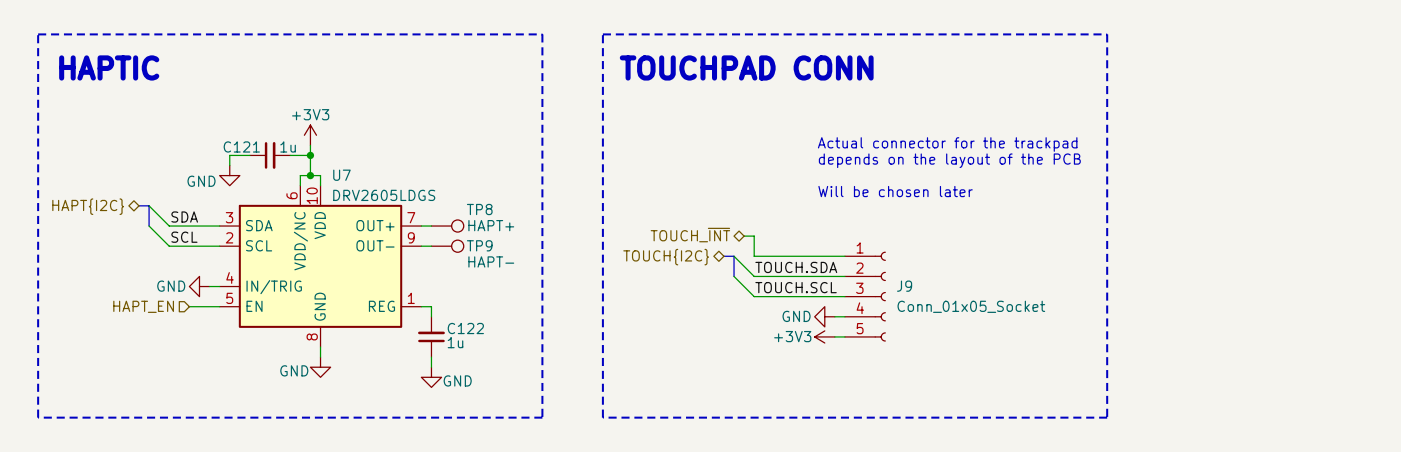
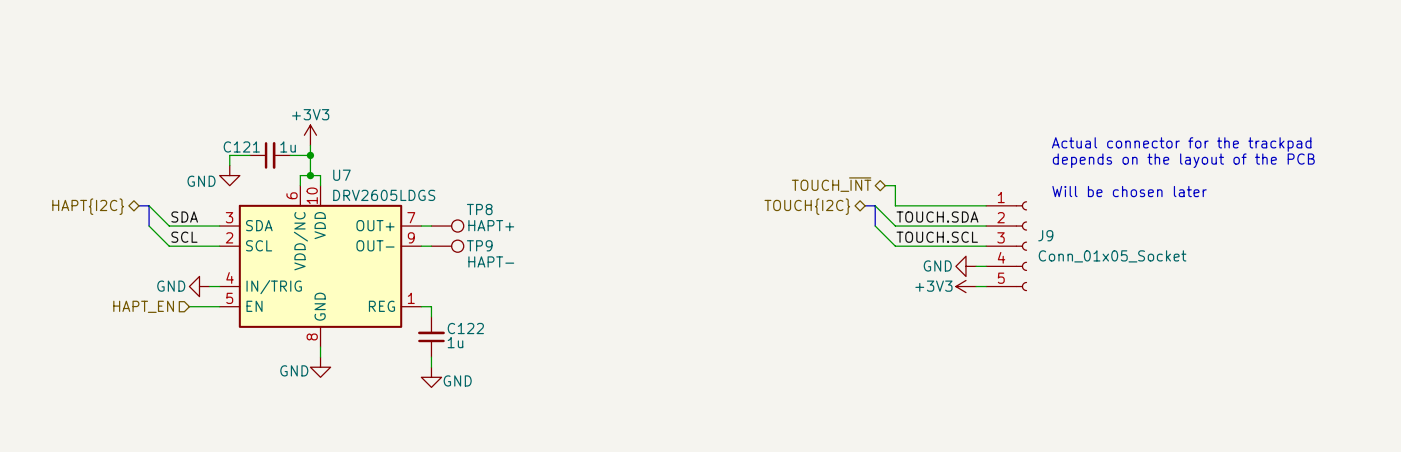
line: (38, 34) (542, 34) (542, 417) (38, 417) (38, 34) -> none
line: (602, 34) (1107, 34) (1107, 417) (602, 417) (602, 34) -> none
text: HAPTIC (109, 67) -> none
text: TOUCHPAD CONN (746, 67) -> none
text: Actual connector for the trackpad (947, 144) -> none
text: none -> Actual connector for the trackpad (1181, 144)
text: depends on the layout of the PCB (949, 160) -> none
text: none -> depends on the layout of the PCB (1183, 160)
text: Will be chosen later (895, 191) -> none
text: none -> Will be chosen later (1129, 191)
hierarchical label position: TOUCH_~{INT} (690, 235) -> TOUCH_~{INT} (831, 184)
wire: (744, 236) (754, 236) (754, 256) (844, 256) -> (885, 185) (895, 185) (895, 205) (986, 205)
bus: (723, 256) (734, 256) (734, 276) -> (865, 205) (875, 205) (875, 226)
wire: (734, 256) (754, 276) (844, 276) -> (875, 205) (895, 226) (986, 226)
hierarchical label position: TOUCH{I2C} (666, 257) -> TOUCH{I2C} (807, 206)
label position: TOUCH.SDA (796, 267) -> TOUCH.SDA (937, 217)
wire: (734, 276) (754, 296) (844, 296) -> (875, 226) (895, 246) (986, 246)
label position: TOUCH.SCL (796, 287) -> TOUCH.SCL (937, 237)
J9 position: (865, 296) -> (1006, 246)
power symbol position: GND (824, 316) -> GND (965, 266)
wire: (834, 316) (844, 316) -> (976, 266) (986, 266)
power symbol position: +3V3 (824, 336) -> +3V3 (965, 286)
wire: (834, 336) (844, 336) -> (976, 286) (986, 286)

